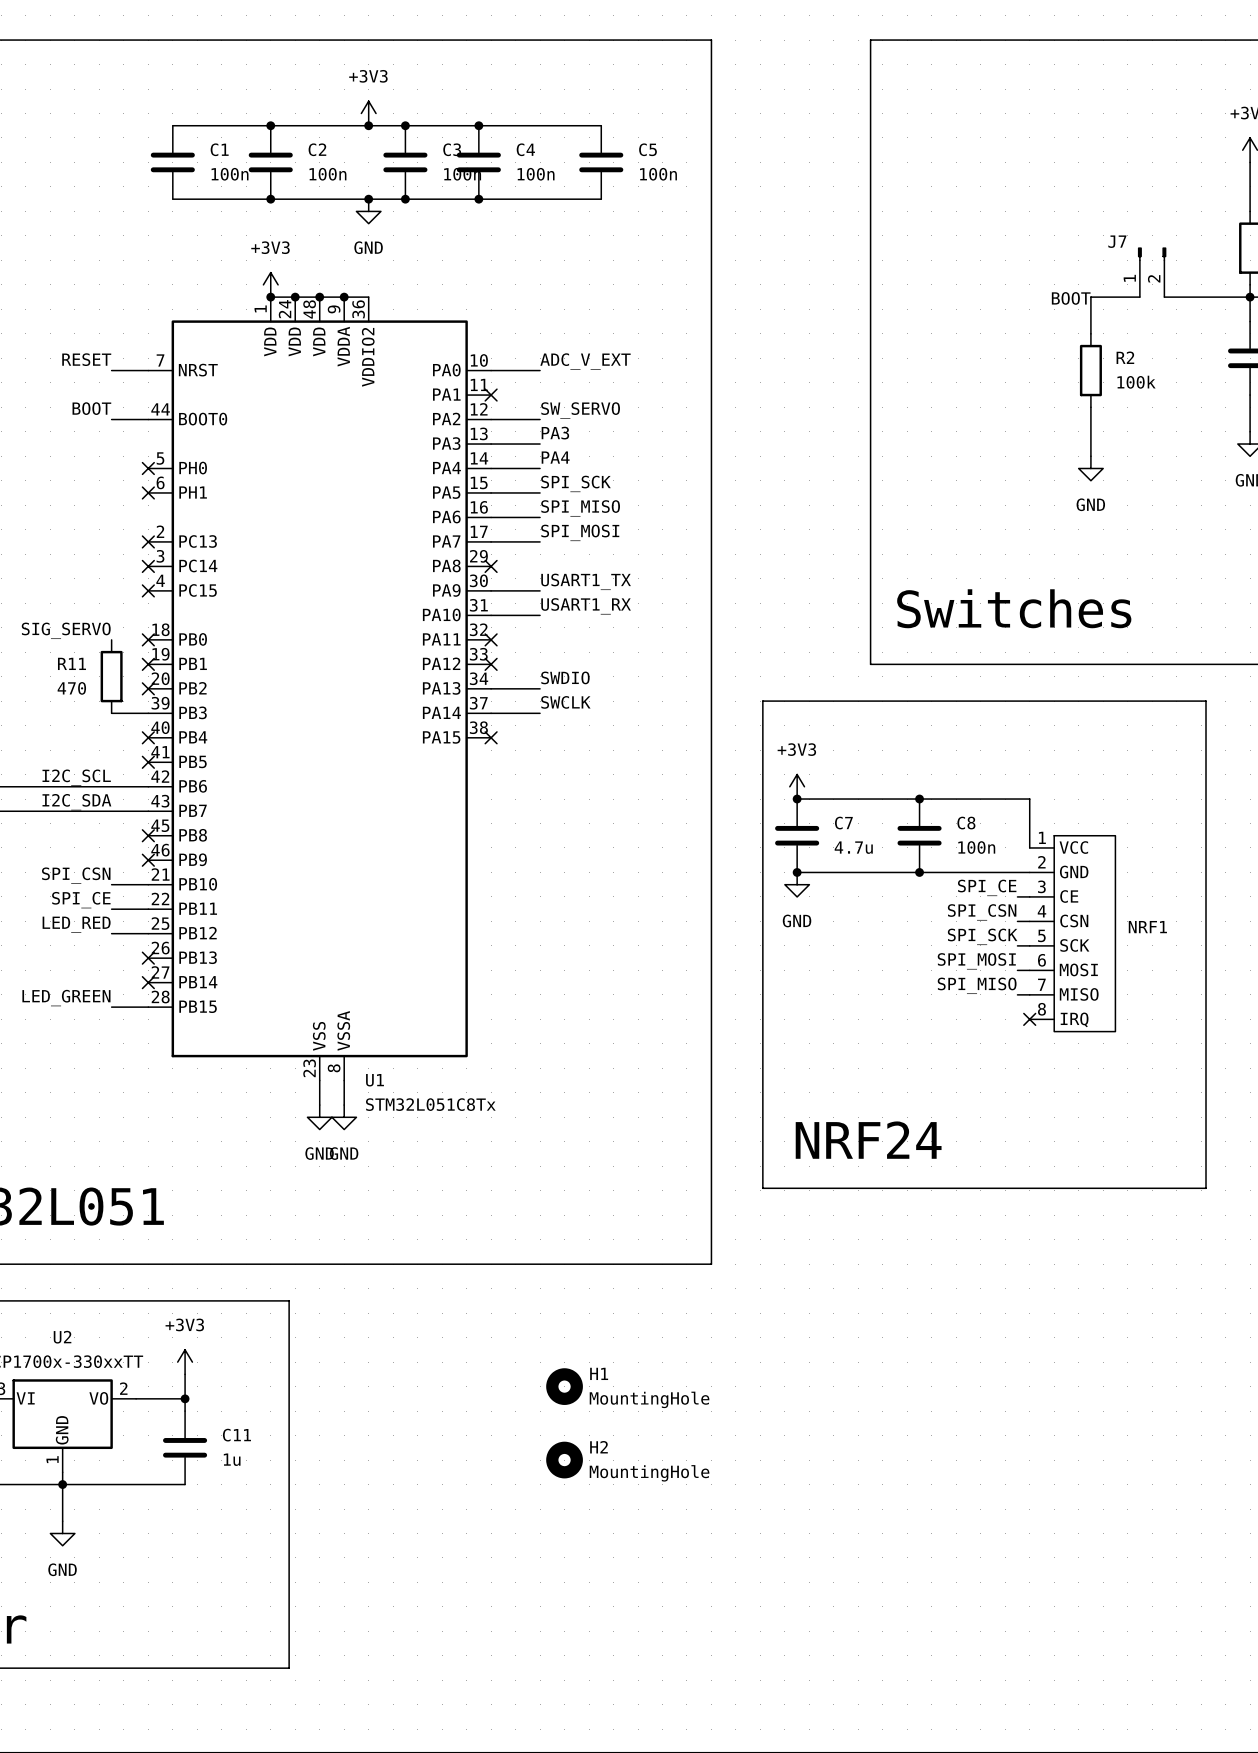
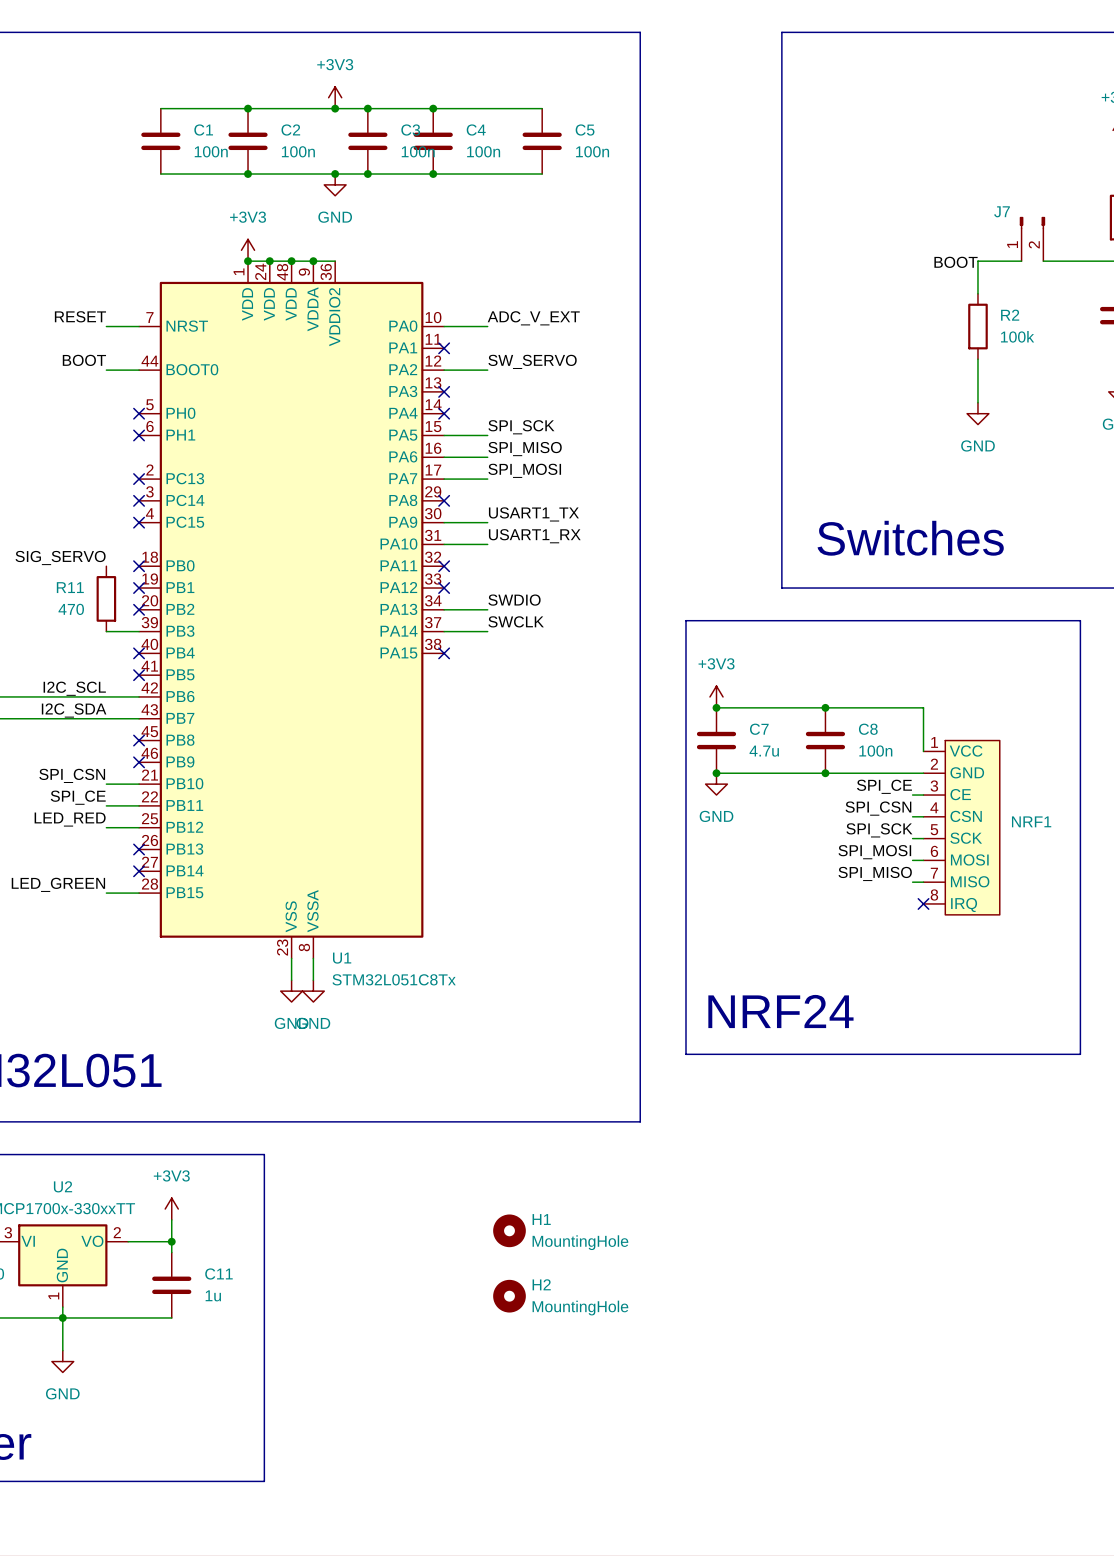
label: PA3 (555, 433) -> none
wire: (491, 444) (540, 444) -> none
no-connect mark: none -> (444, 391)
label: PA4 (555, 457) -> none
wire: (491, 468) (540, 468) -> none
no-connect mark: none -> (444, 413)

